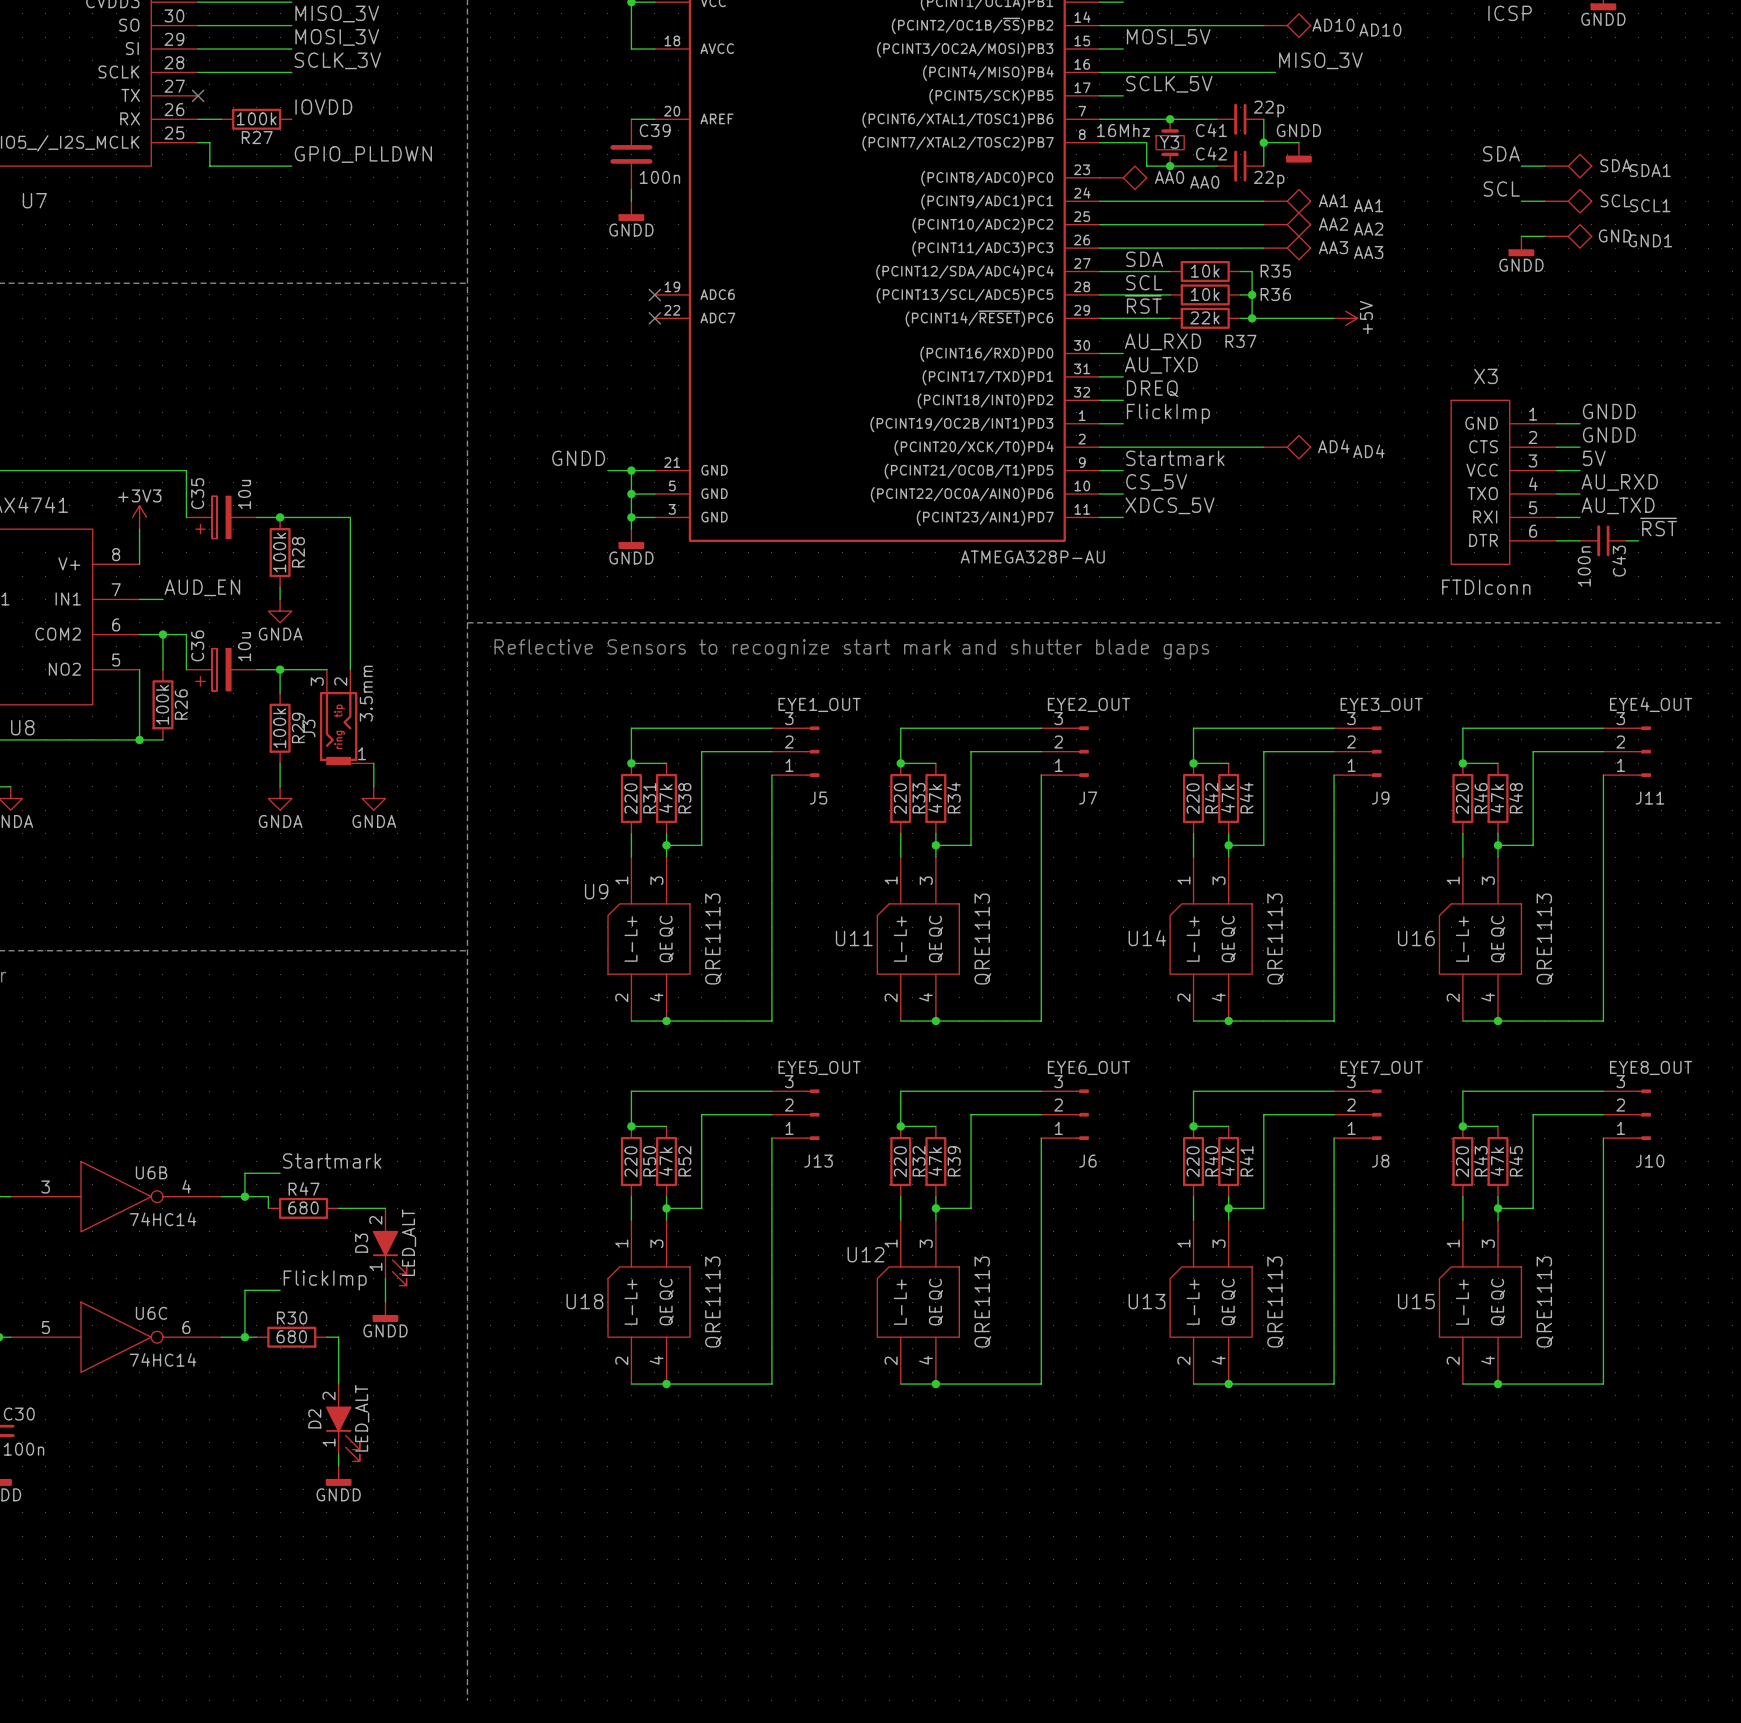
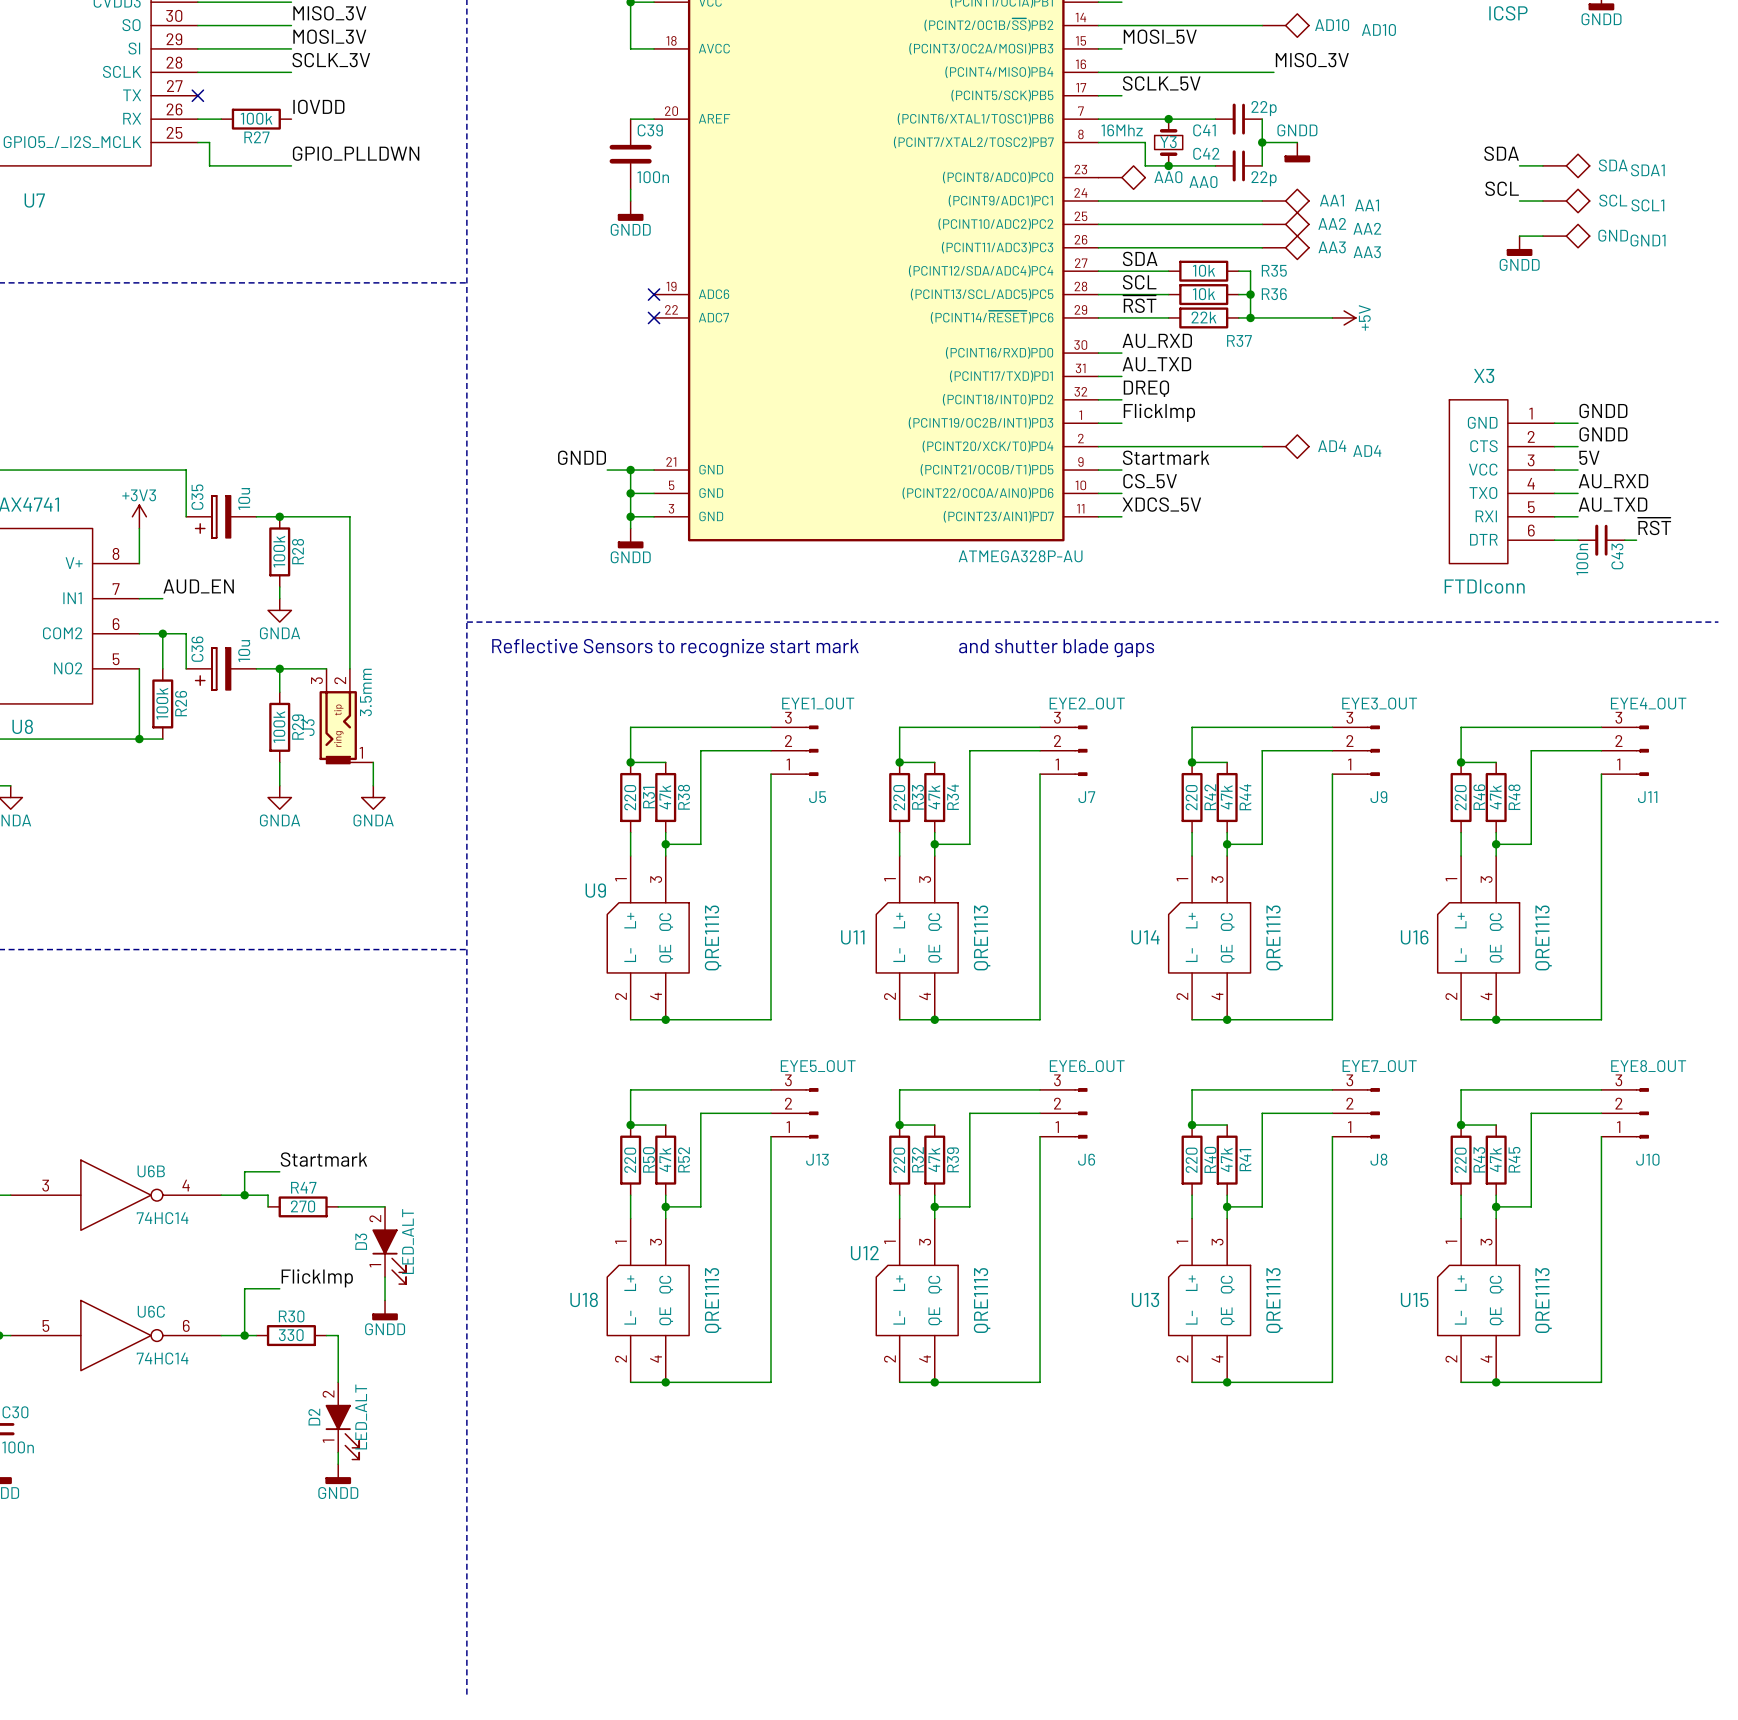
R47 value: 680 (303, 1207) -> 270 (303, 1206)
R30 value: 680 (291, 1336) -> 330 (291, 1335)

